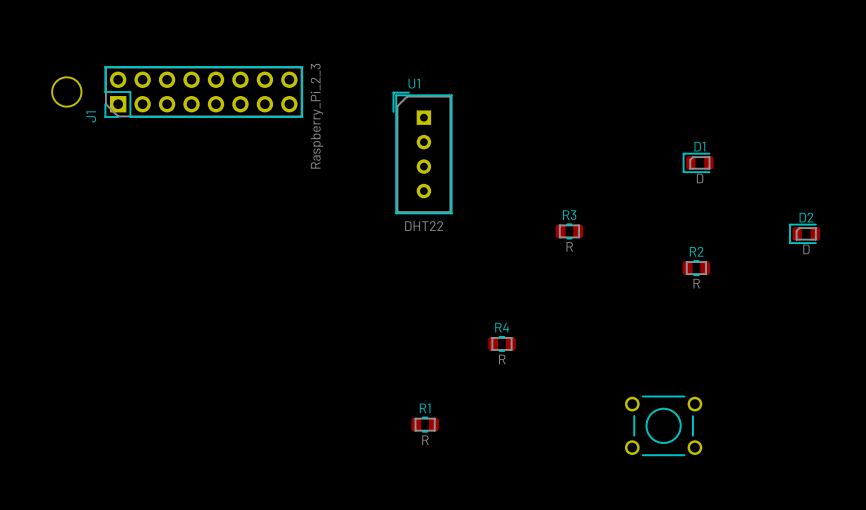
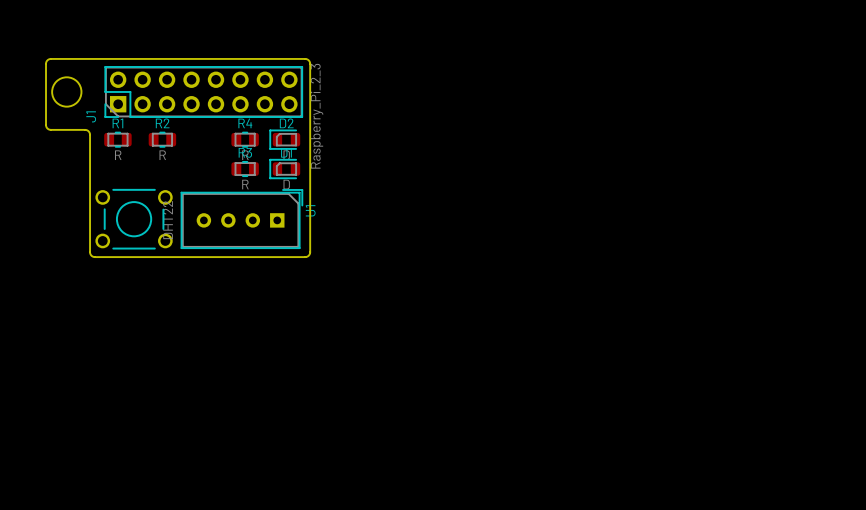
board edge: none -> (50, 58) (308, 59) (310, 63) (309, 255) (305, 257) (91, 256) (90, 252) (89, 133) (85, 129) (50, 129) (46, 127) (46, 63) (50, 58)
U1 rotation: 0° (422, 153) -> 90° clockwise (241, 219)
U1 position: (422, 153) -> (241, 219)
D1 position: (698, 162) -> (284, 169)
part: none -> (134, 219)
R3 position: (569, 231) -> (245, 169)
D2 position: (804, 233) -> (284, 139)
R2 position: (696, 268) -> (162, 139)
R4 position: (501, 343) -> (245, 139)
R1 position: (425, 424) -> (117, 139)
part: (663, 425) -> none

